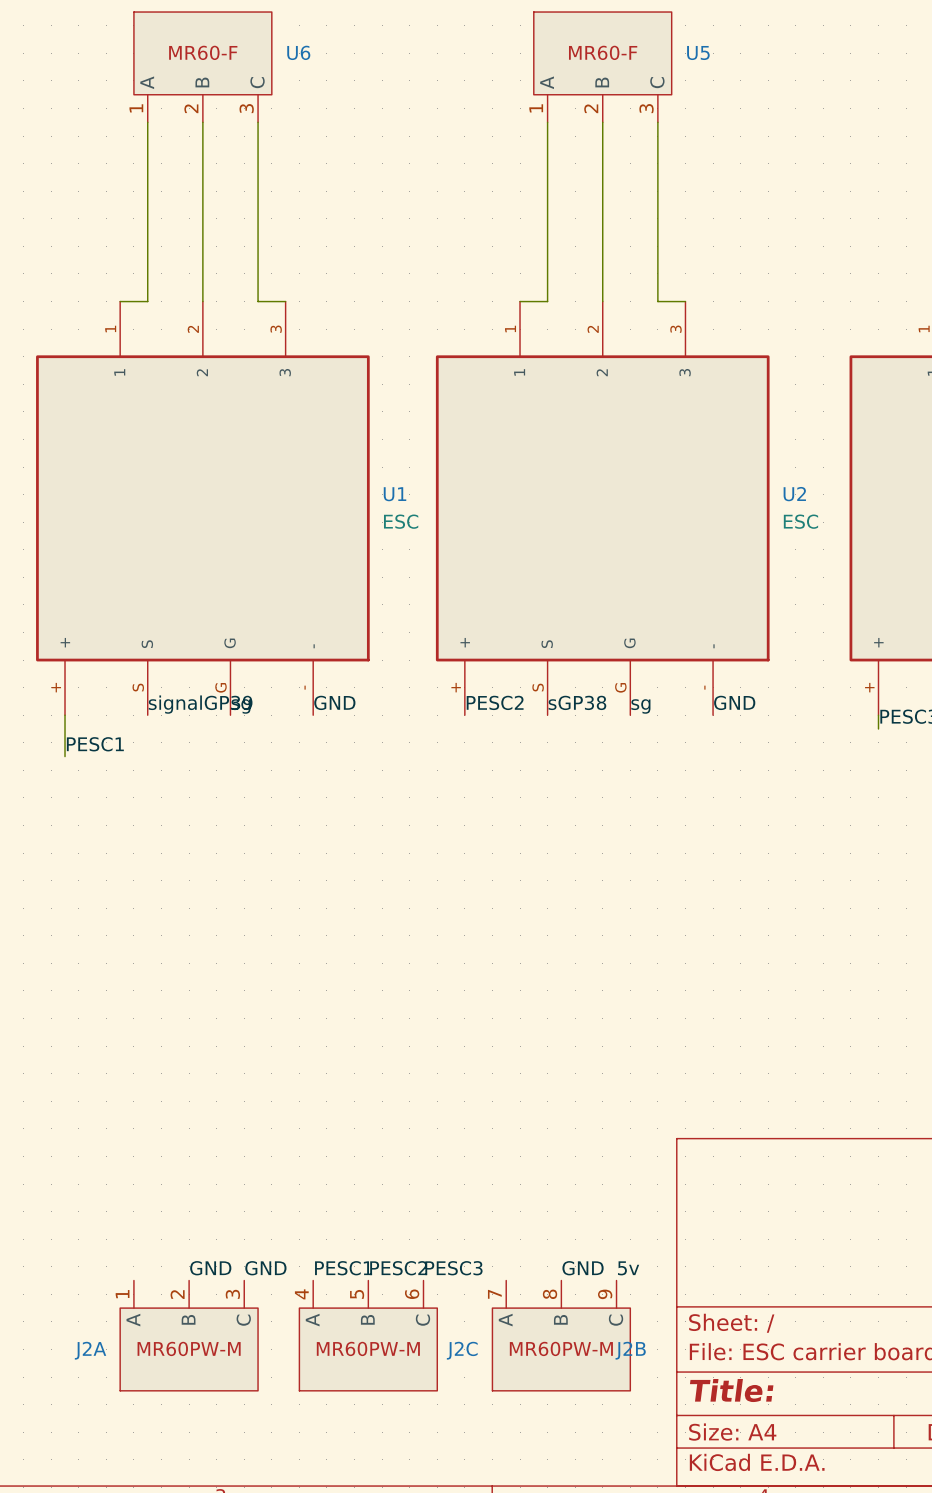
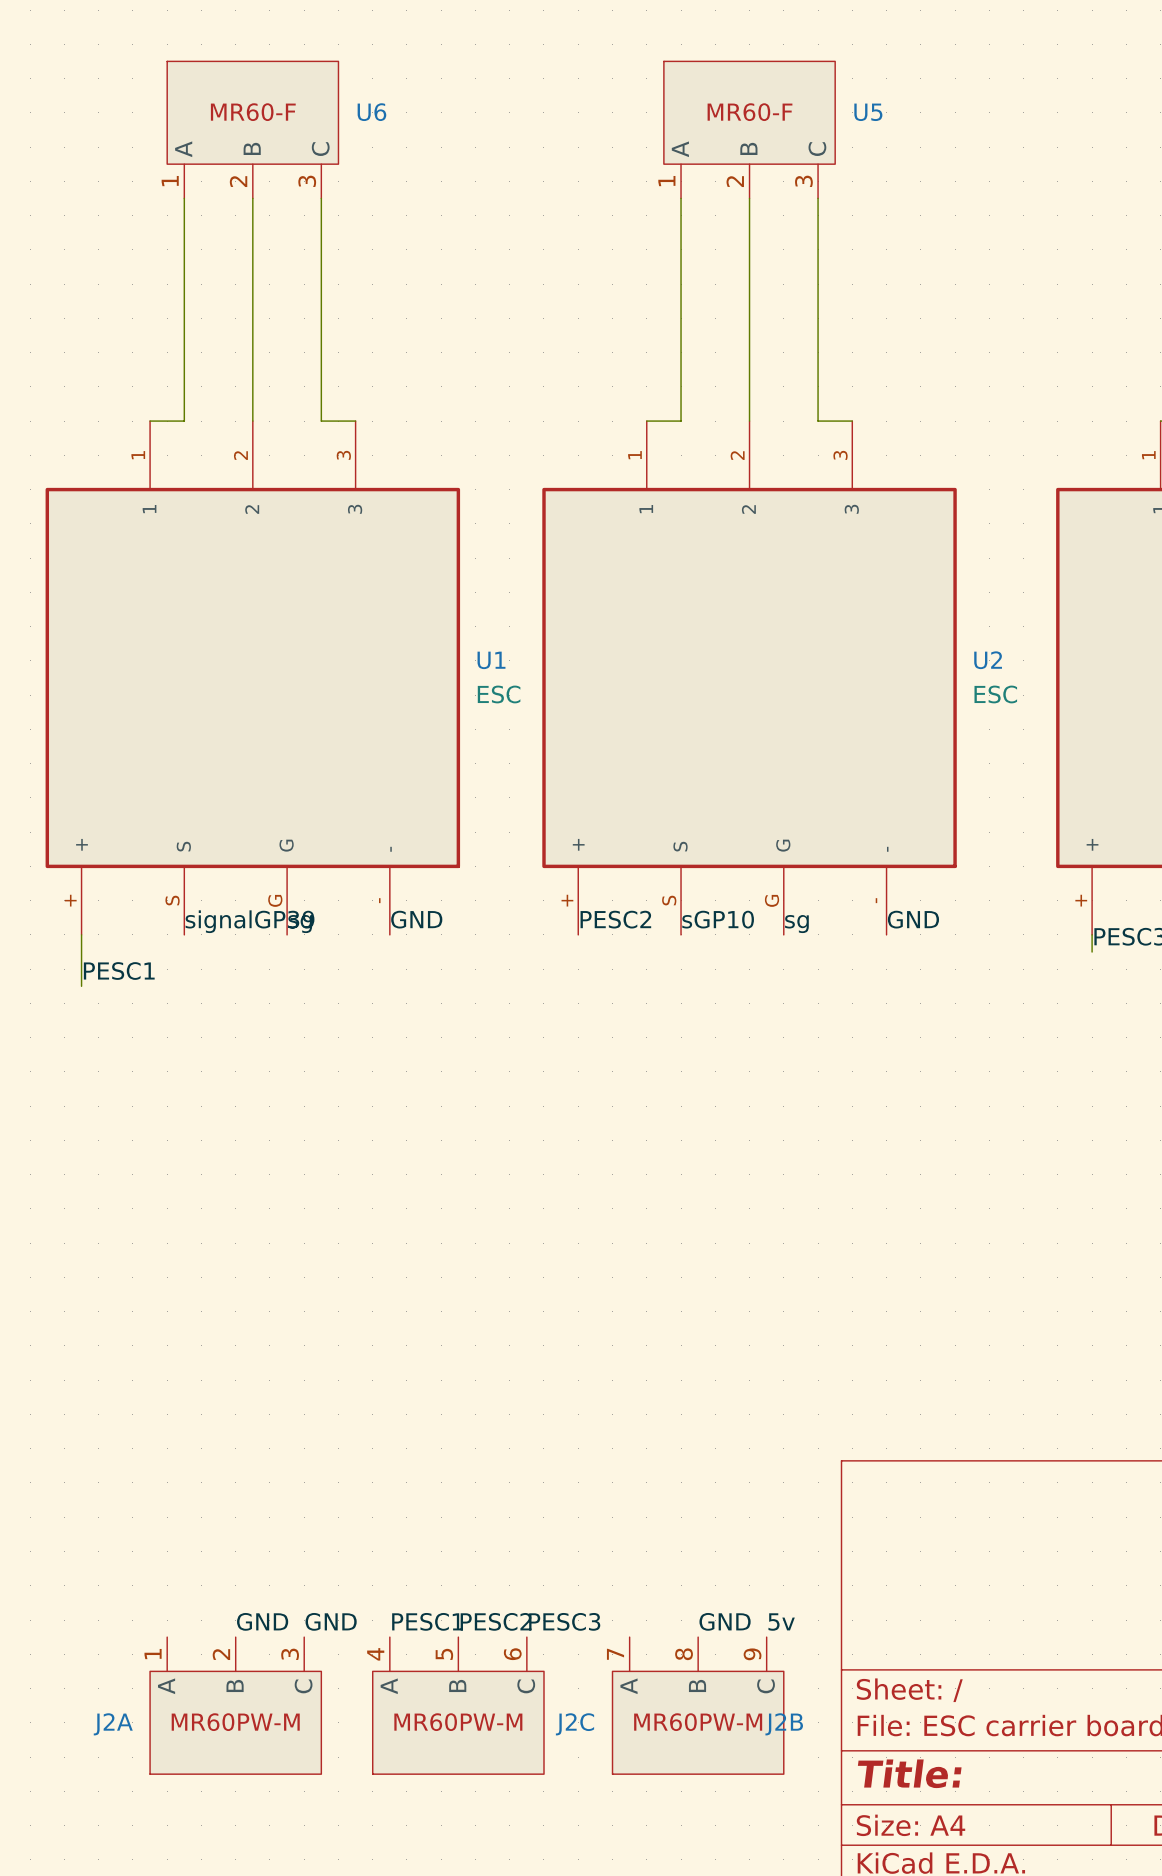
label: sGP38 (577, 702) -> sGP10 (718, 919)

